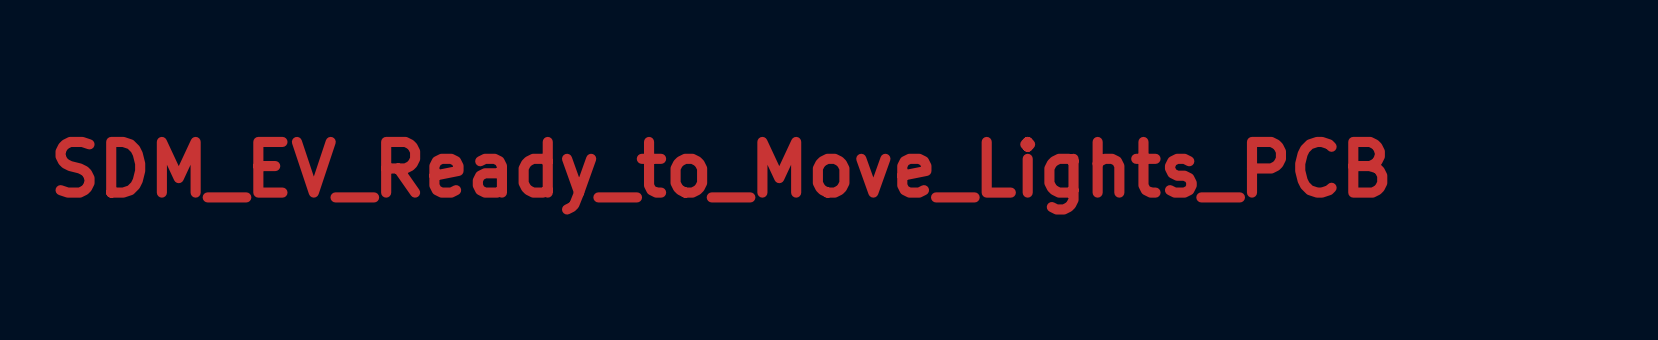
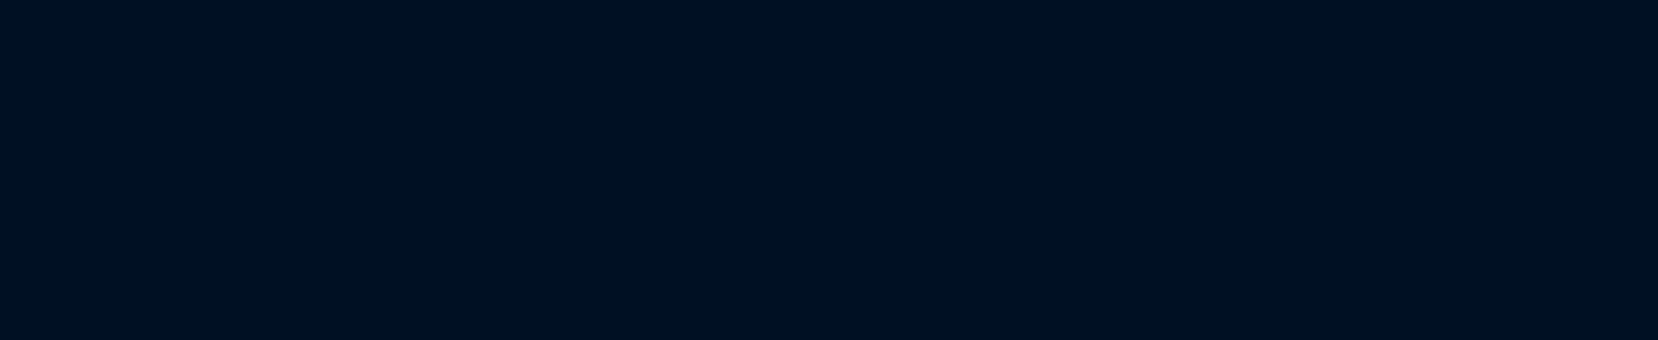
text: SDM_EV_Ready_to_Move_Lights_PCB (721, 175) -> none

